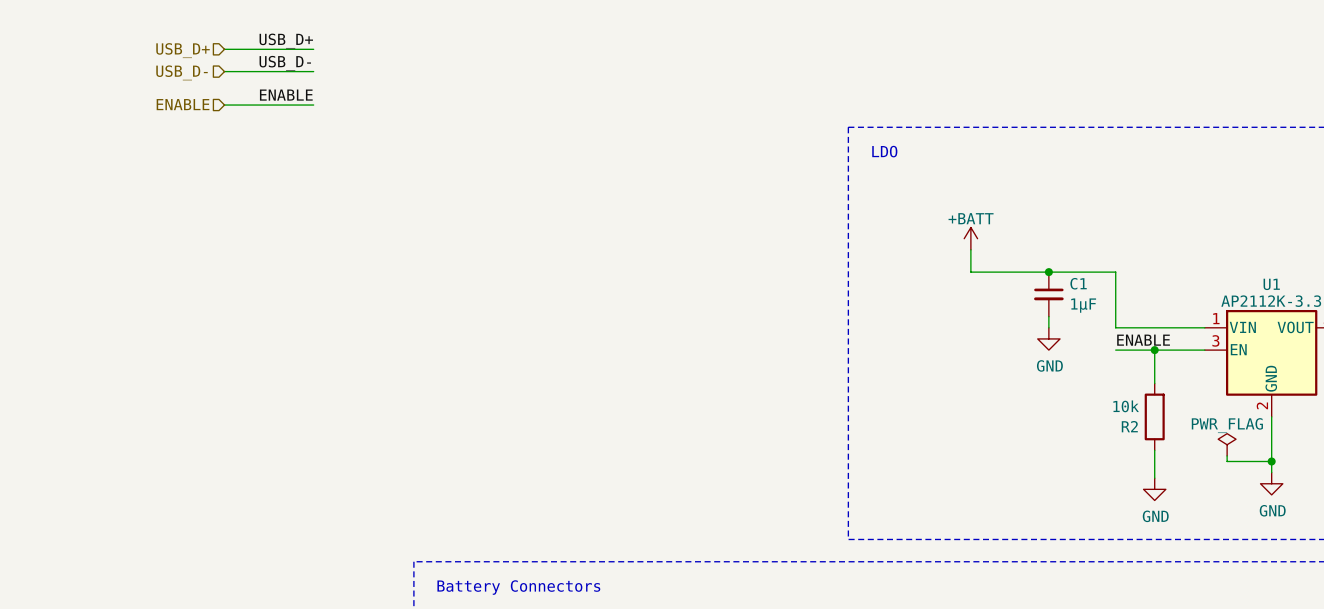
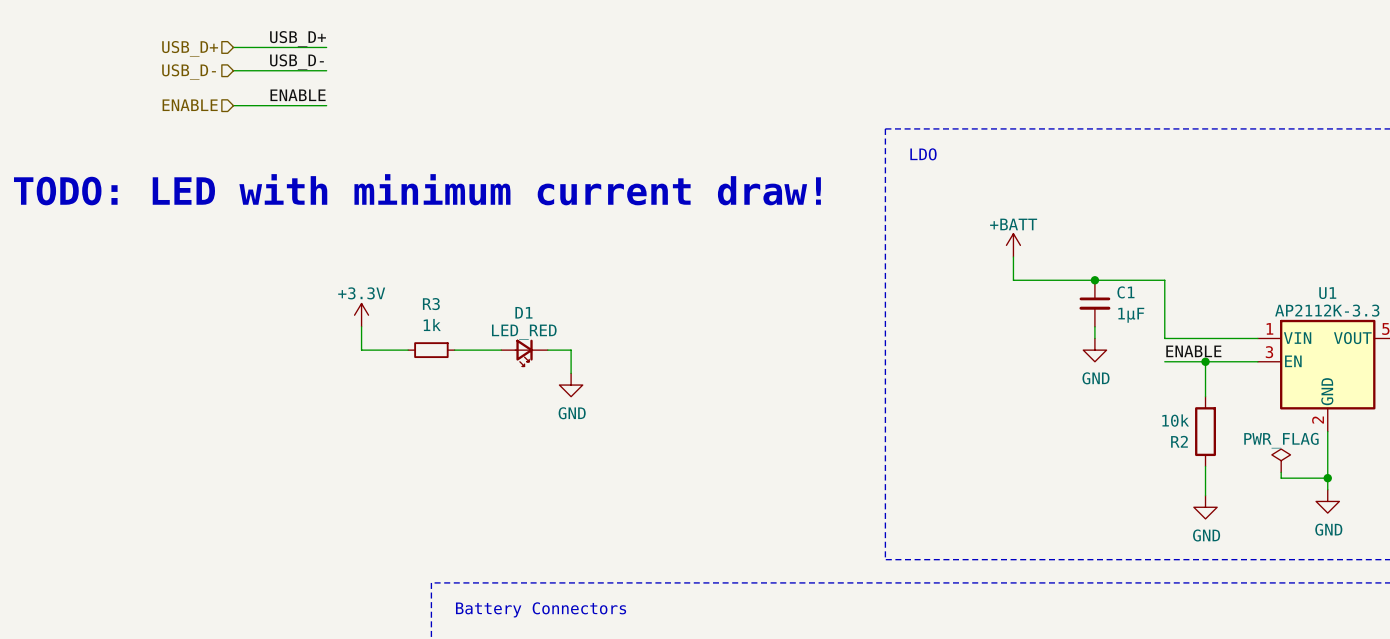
text: none -> TODO: LED with minimum current draw! (417, 189)
power symbol: none -> +3.3V (361, 315)
wire: none -> (361, 326) (361, 350) (408, 350)
R3: none -> 1k (431, 350)
wire: none -> (454, 350) (501, 350)
wire: none -> (547, 350) (571, 350) (571, 373)
D1: none -> LED_RED (524, 353)
power symbol: none -> GND (571, 385)

